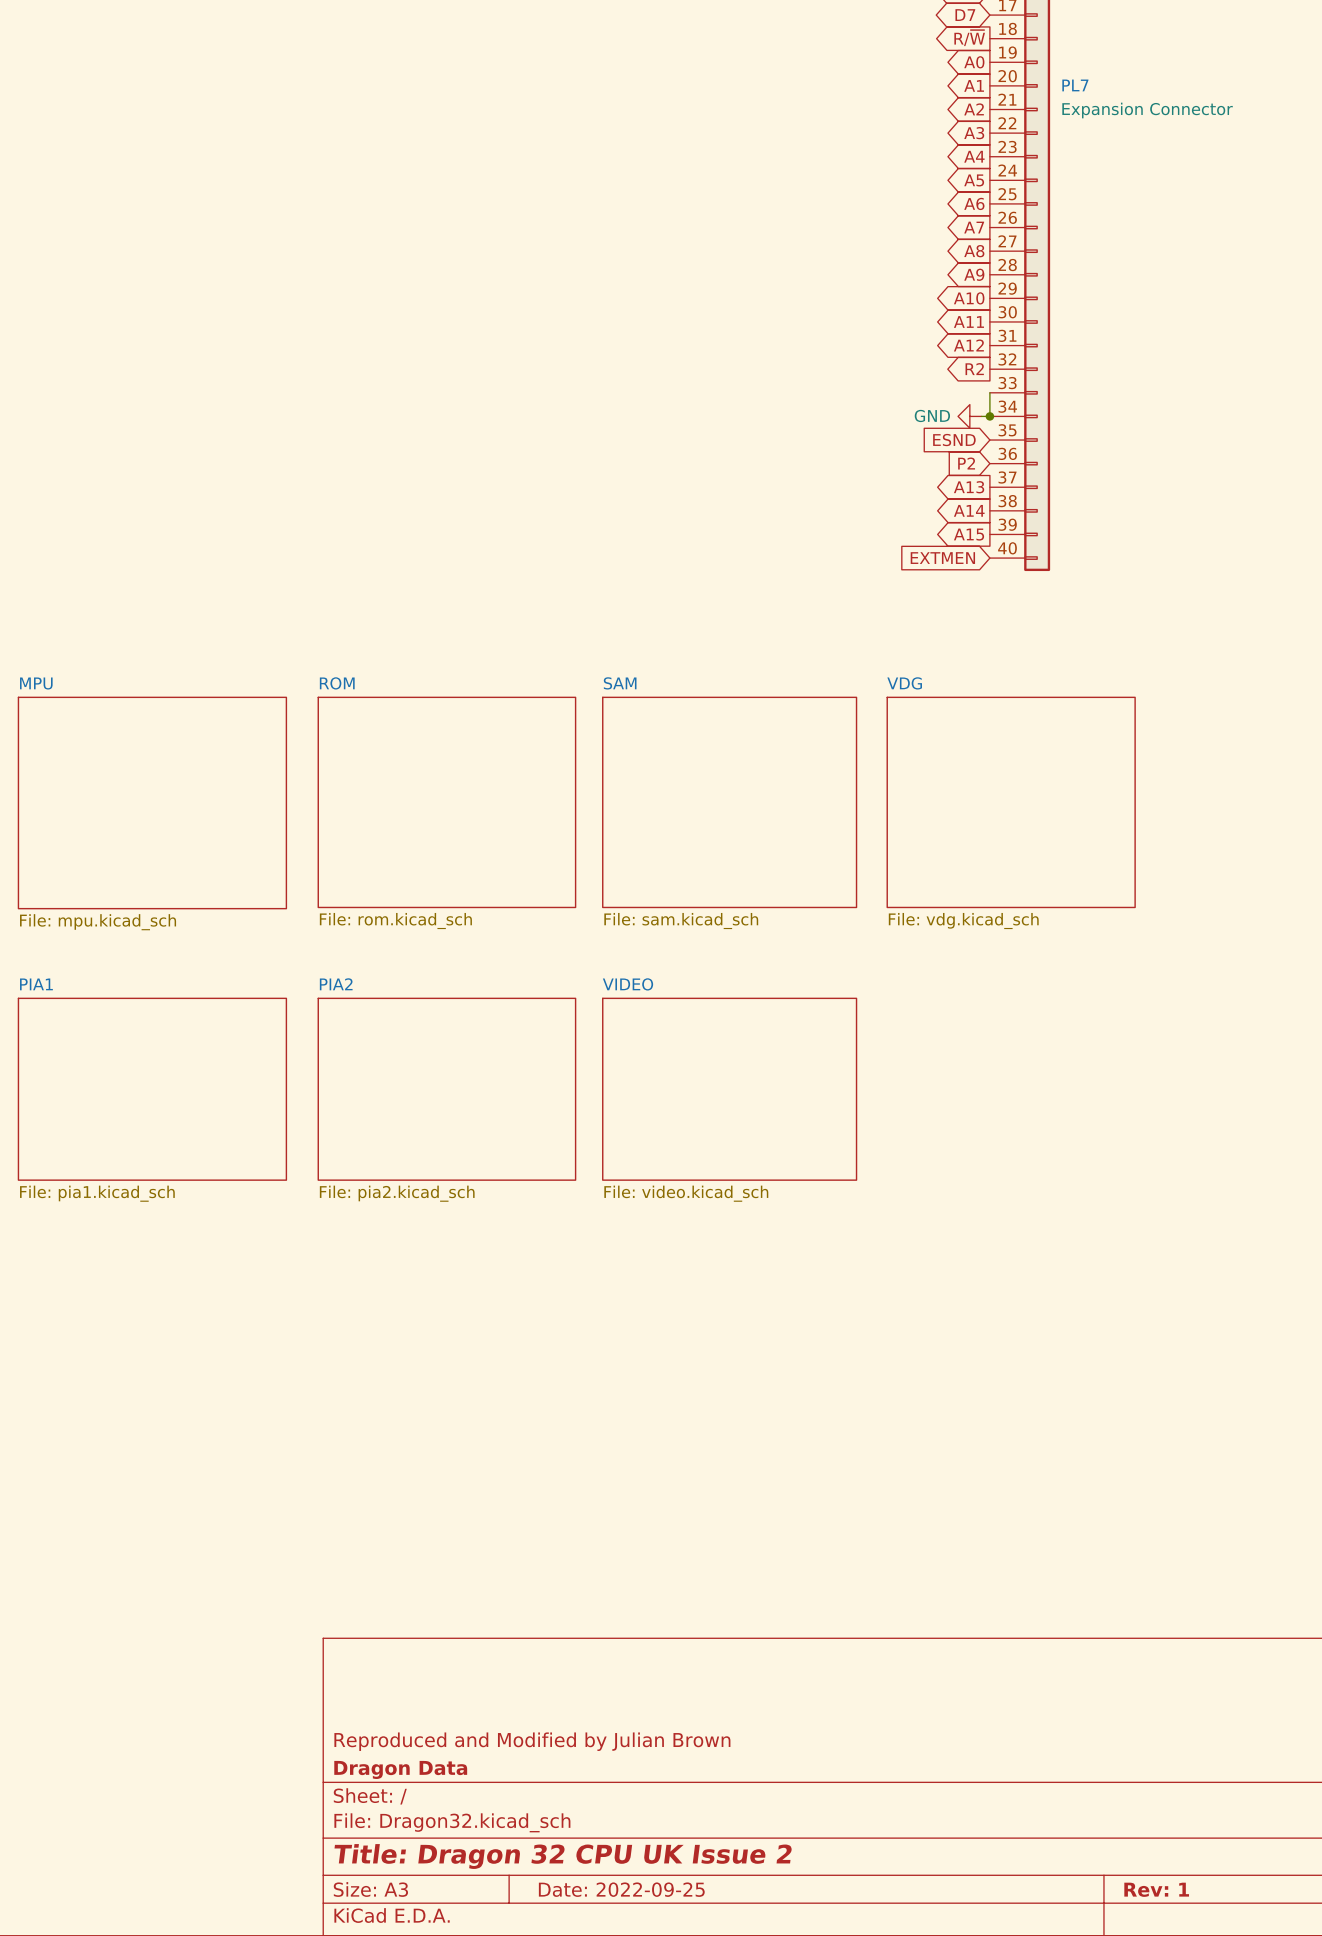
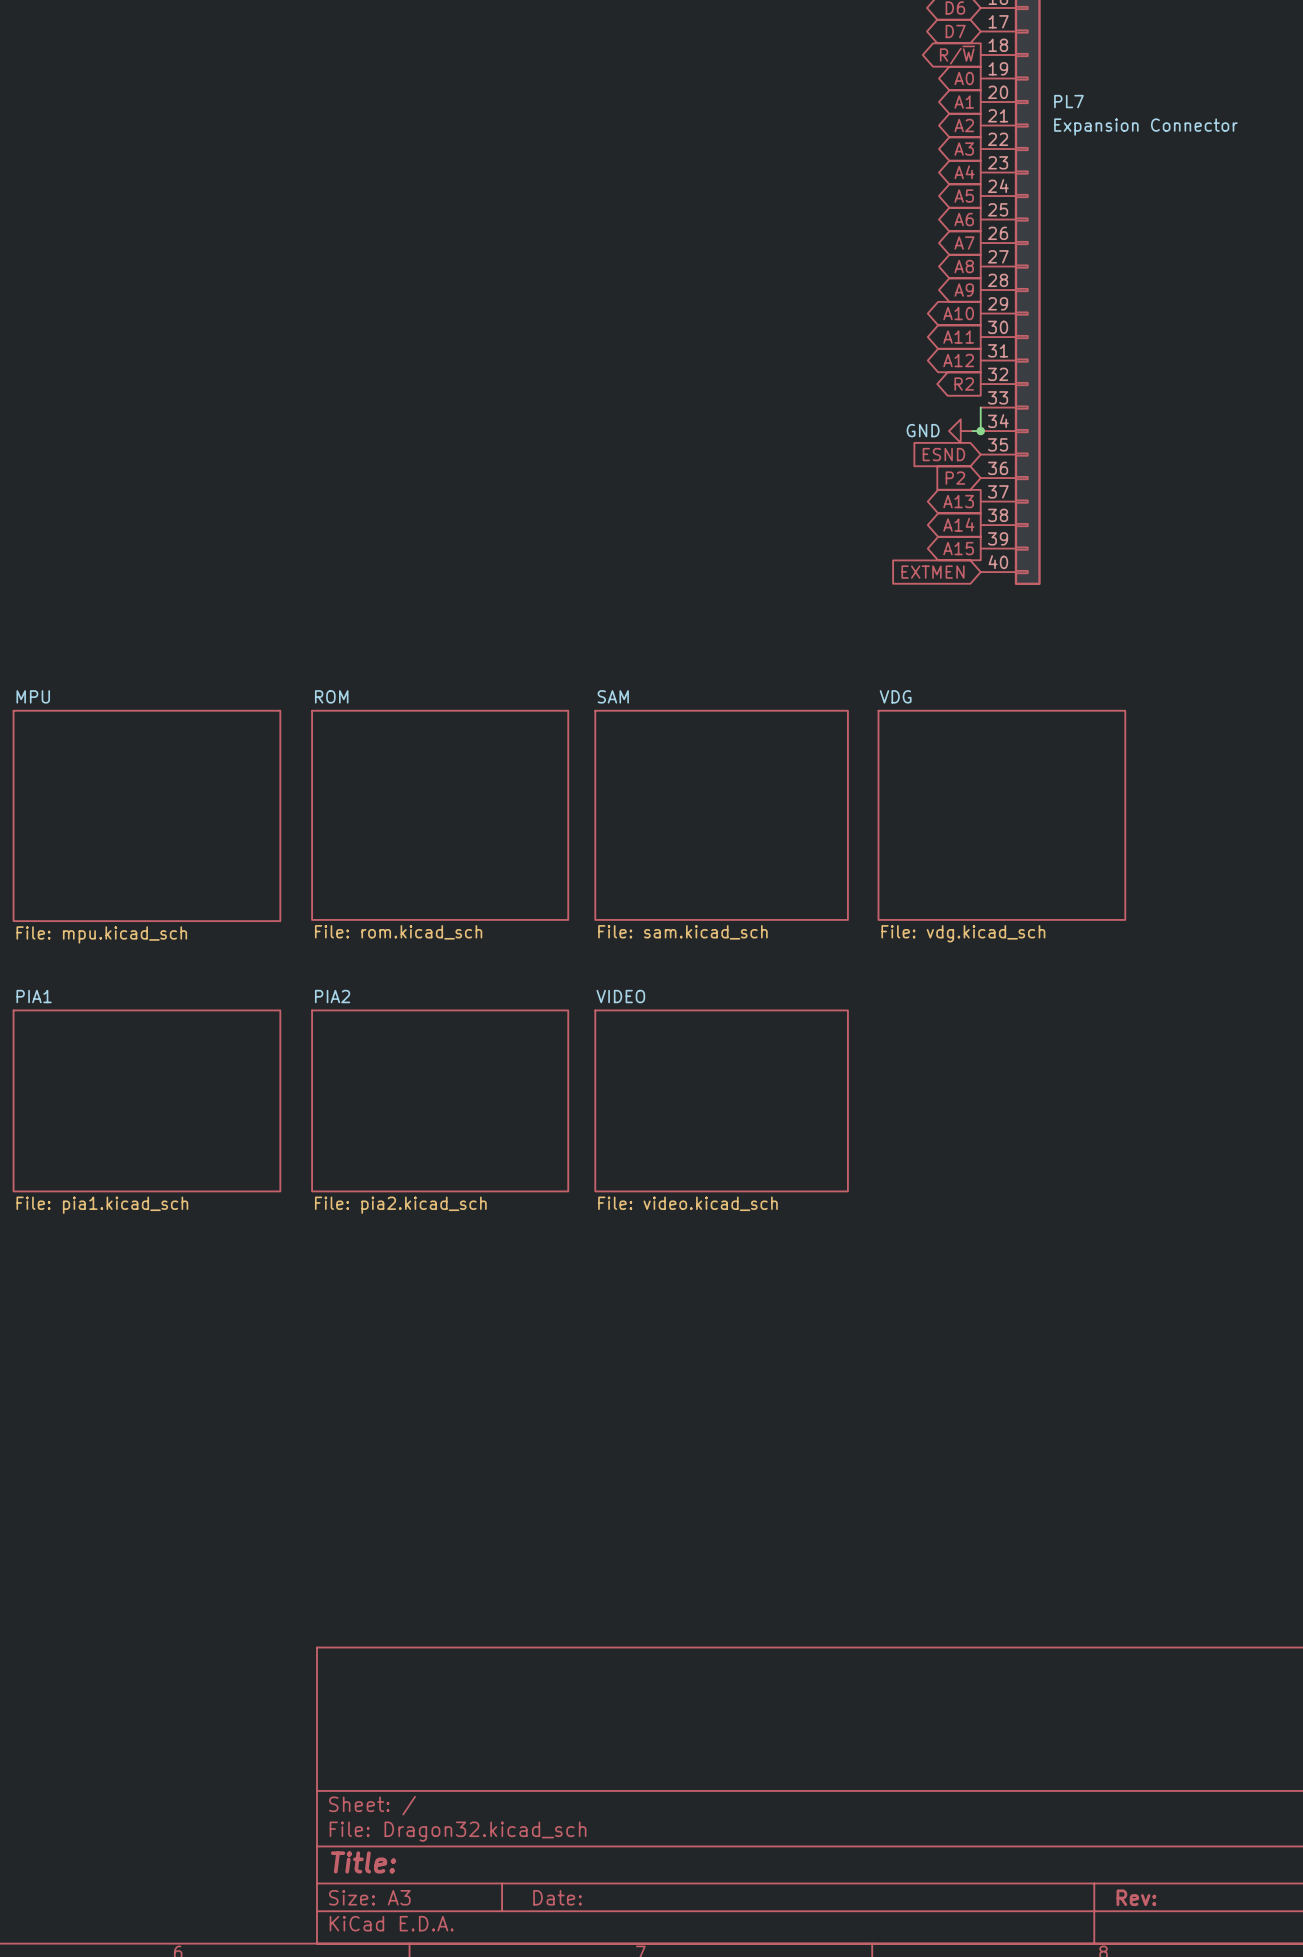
title block: Reproduced and Modified by Julian Brown (532, 1741) -> none
title block: Dragon Data (400, 1769) -> none
title block: Title: Dragon 32 CPU UK Issue 2 (563, 1856) -> Title: (363, 1862)
title block: Date: 2022-09-25 (621, 1889) -> Date: (557, 1897)
title block: Rev: 1 (1156, 1889) -> Rev: (1136, 1897)

